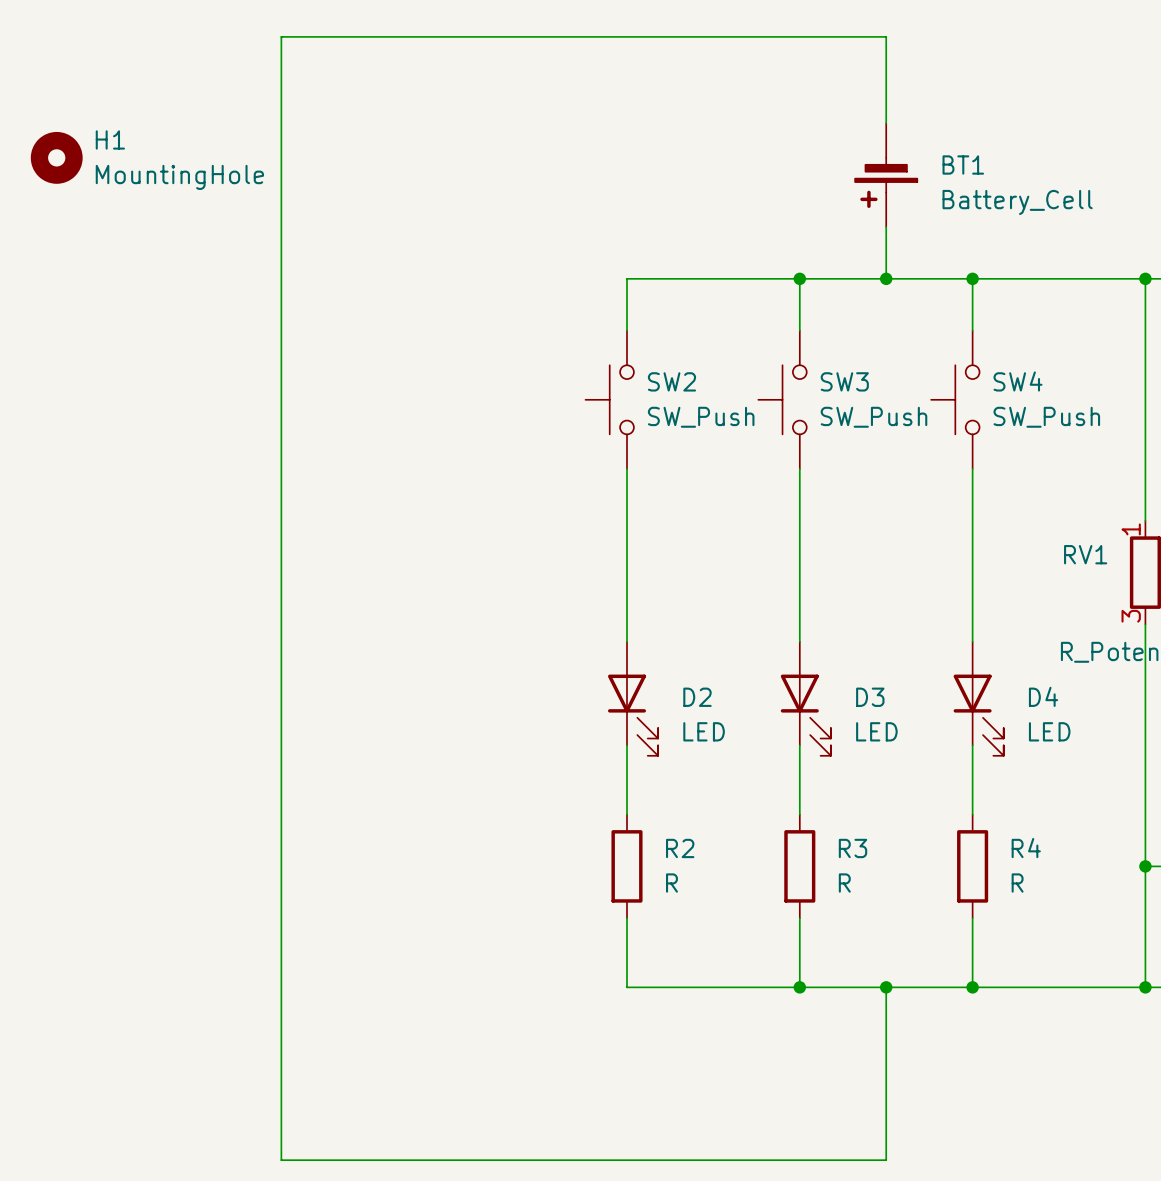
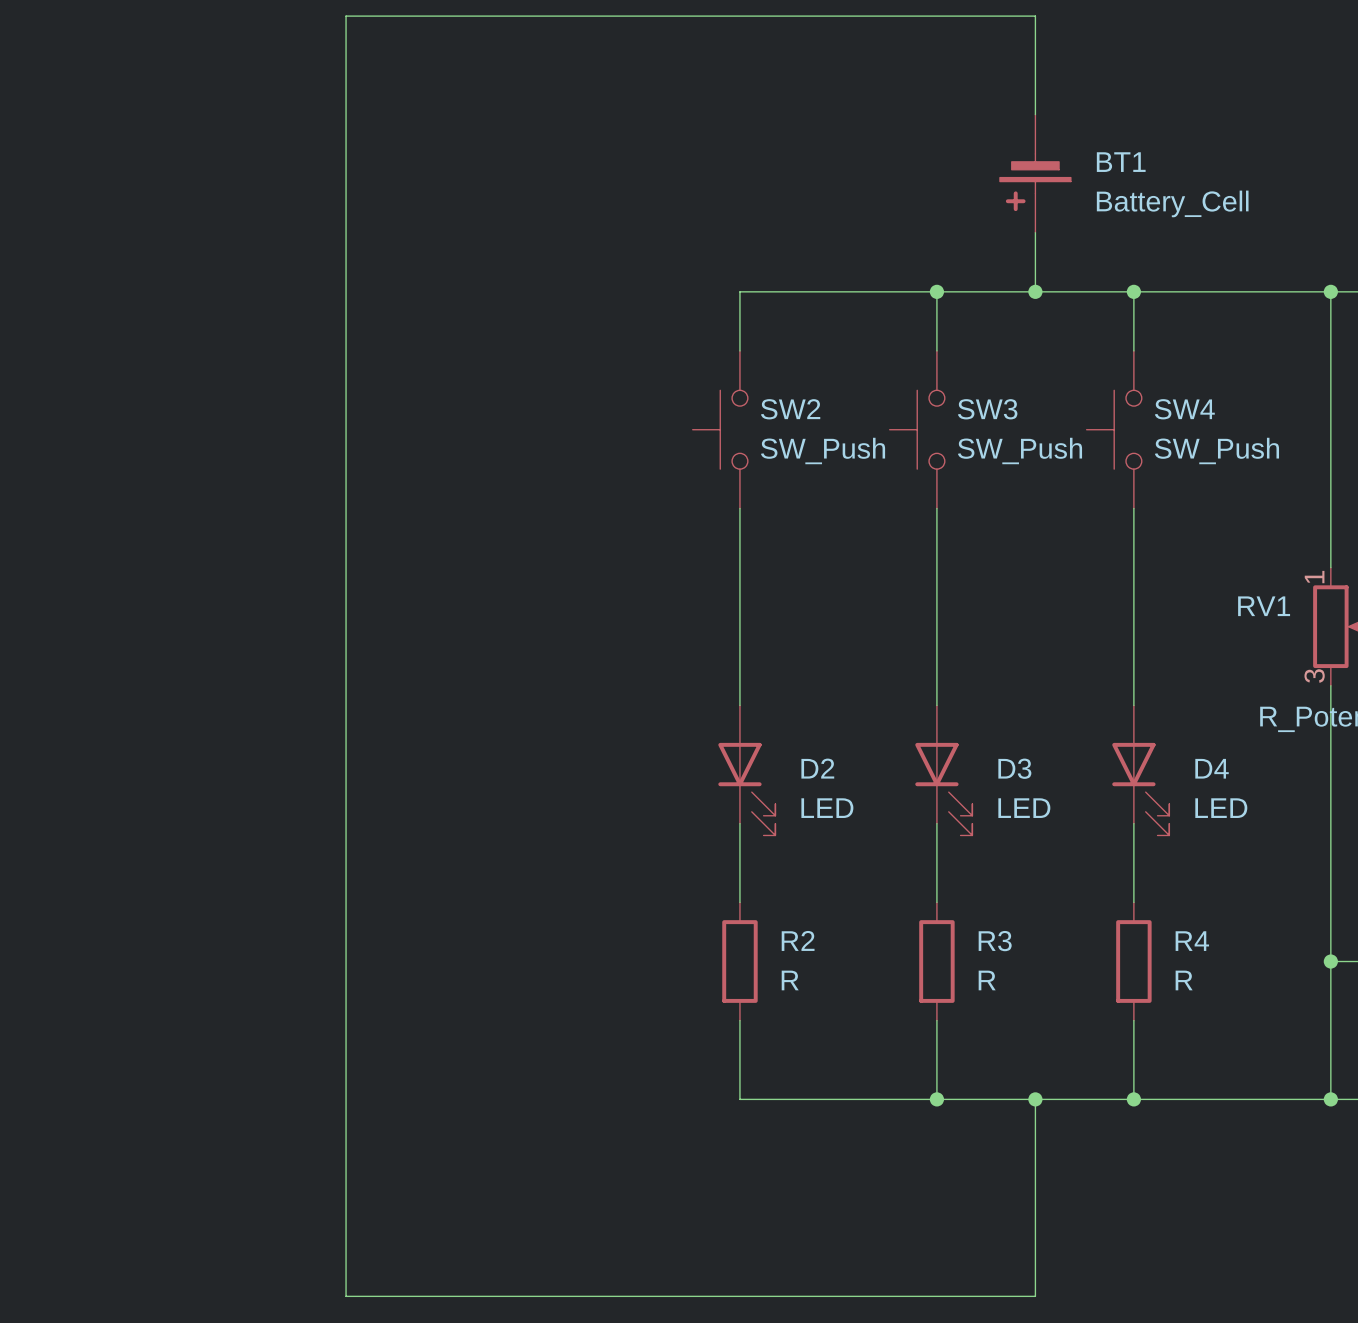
H1: MountingHole (56, 157) -> none

